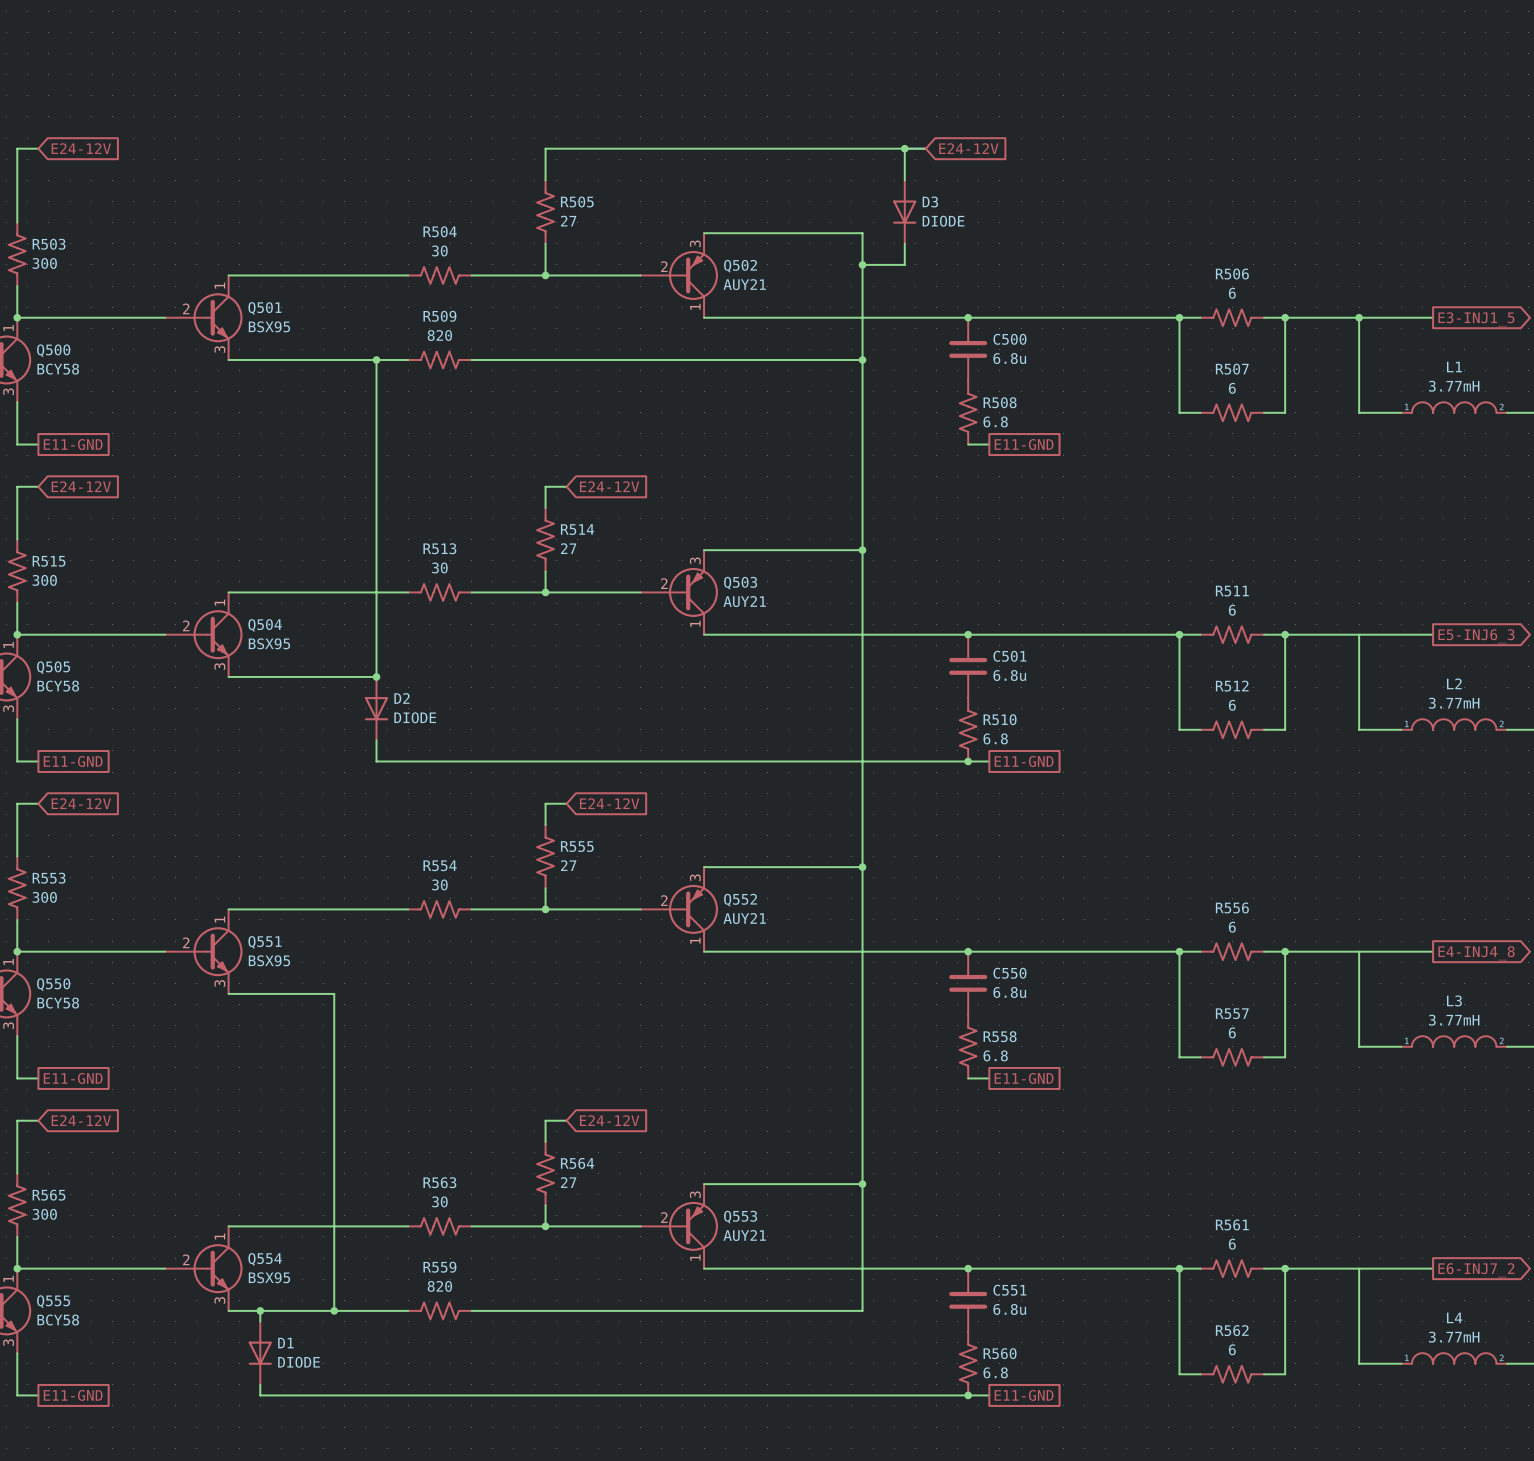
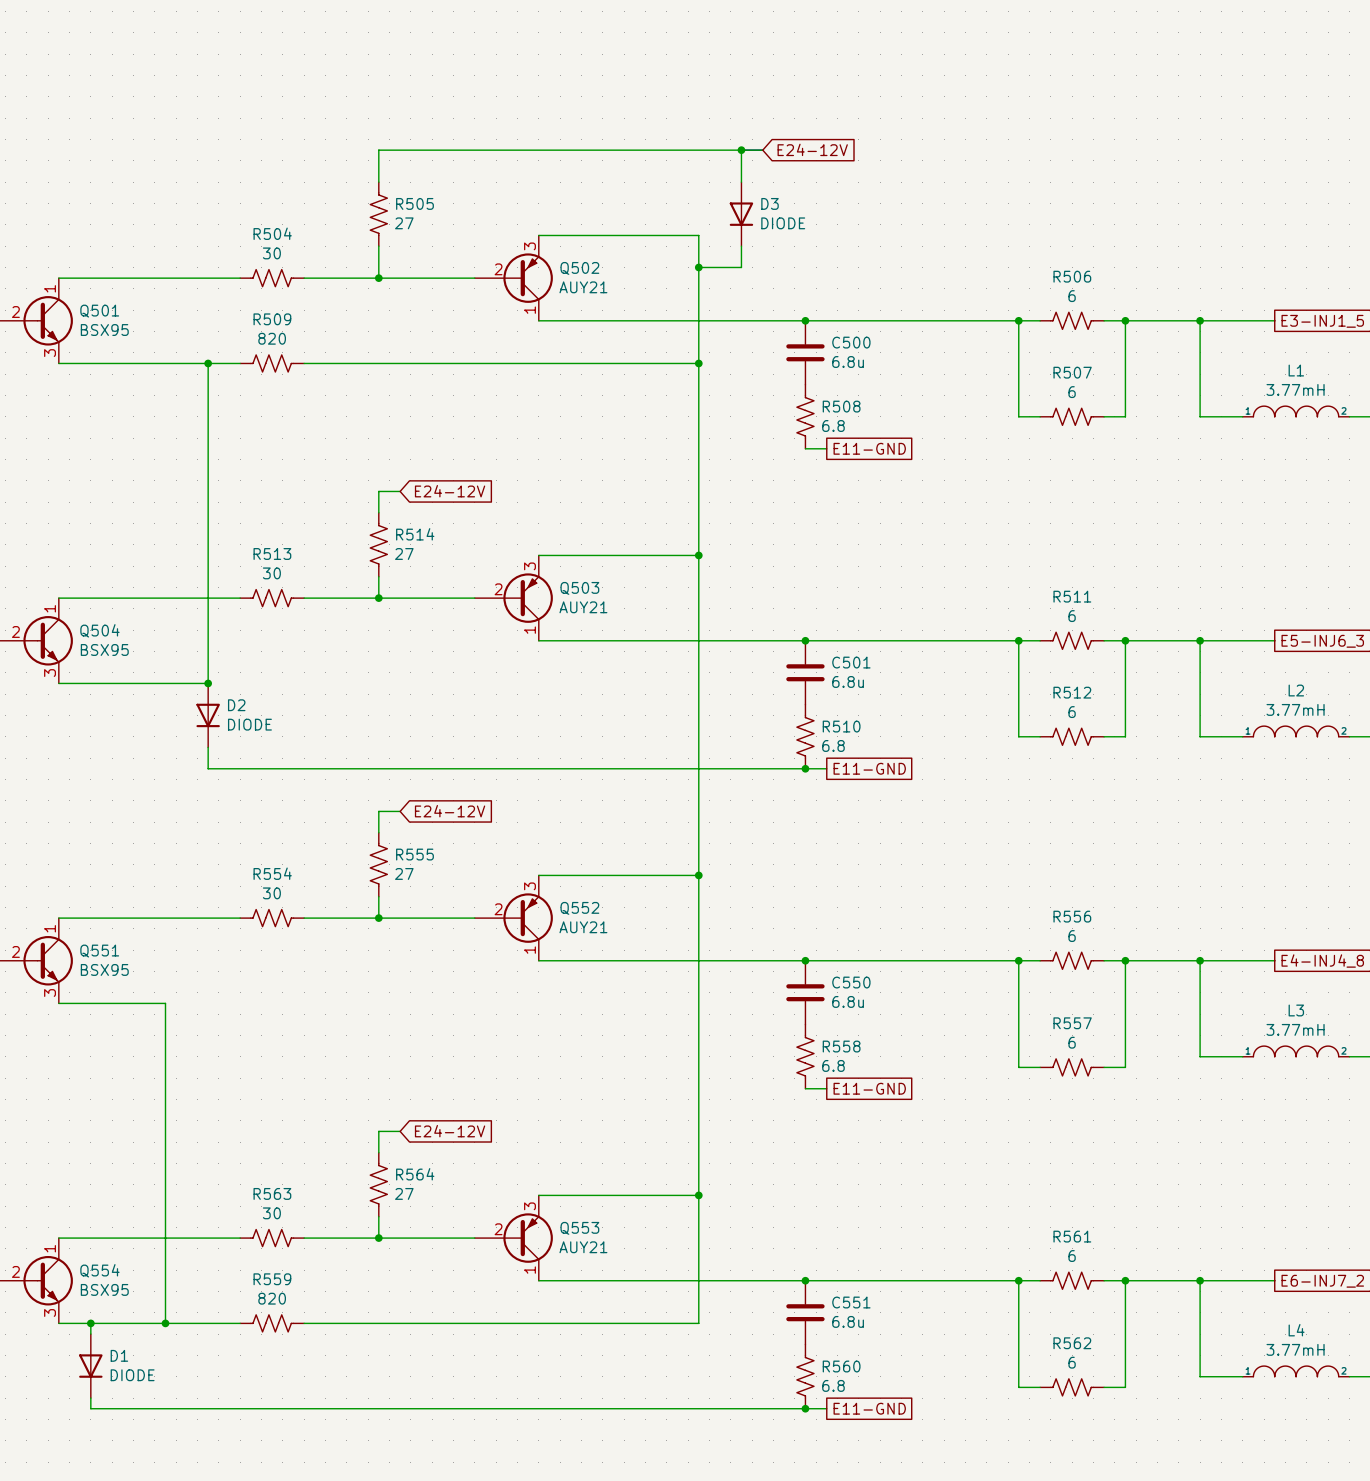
junction: none -> (1200, 640)
junction: none -> (1200, 960)
junction: none -> (1200, 1280)

